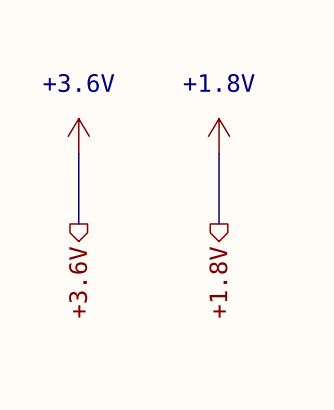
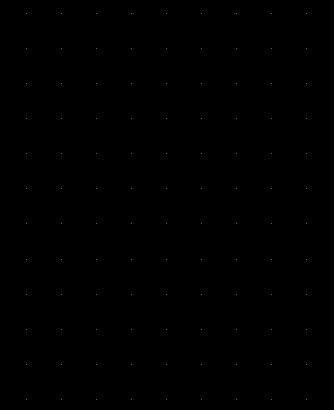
power symbol: +3.6V (78, 136) -> none
power symbol: +1.8V (219, 136) -> none
wire: (78, 153) (78, 223) -> none
wire: (219, 153) (219, 223) -> none
hierarchical label: +3.6V (78, 282) -> none
hierarchical label: +1.8V (218, 282) -> none

